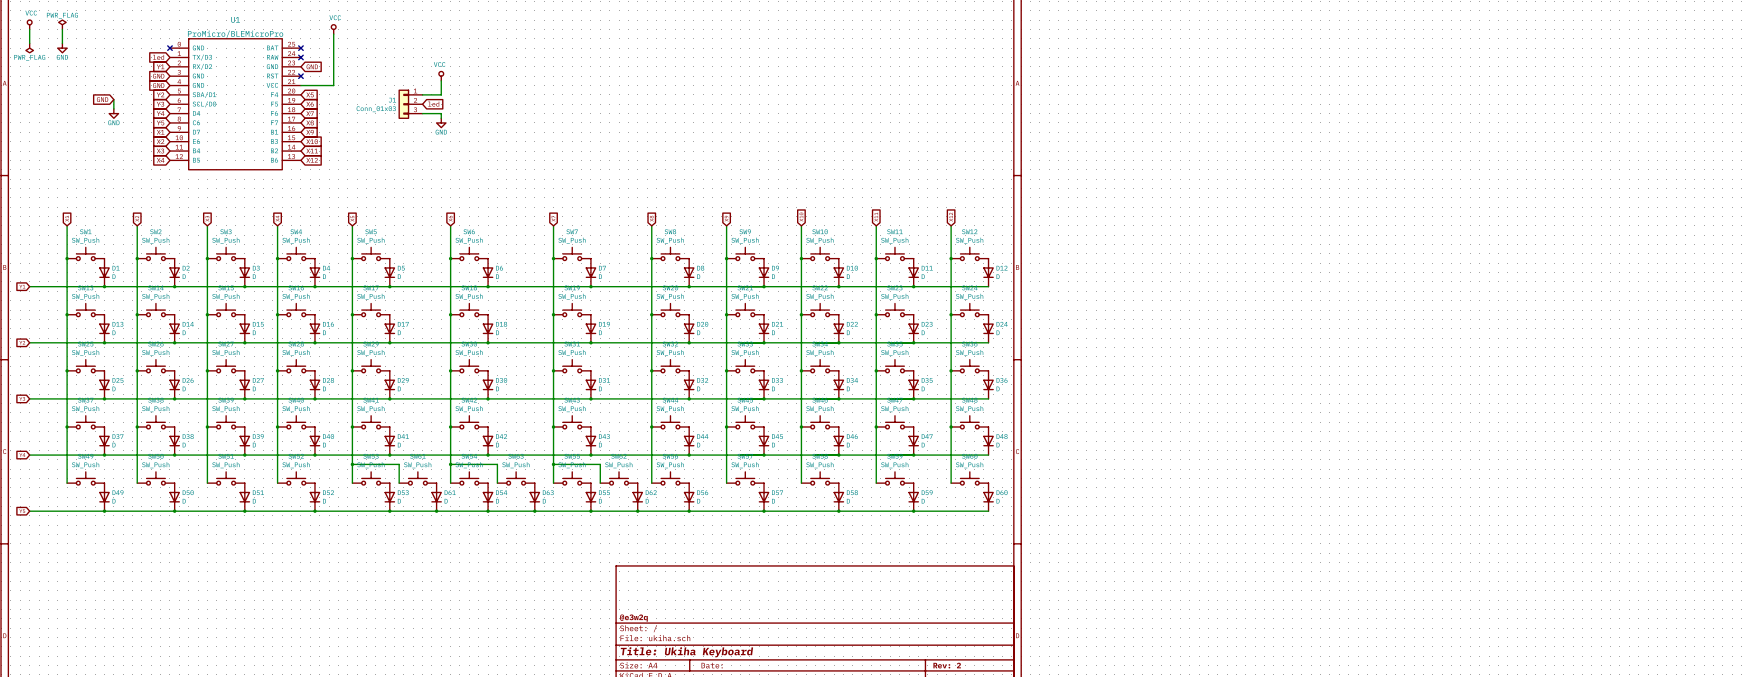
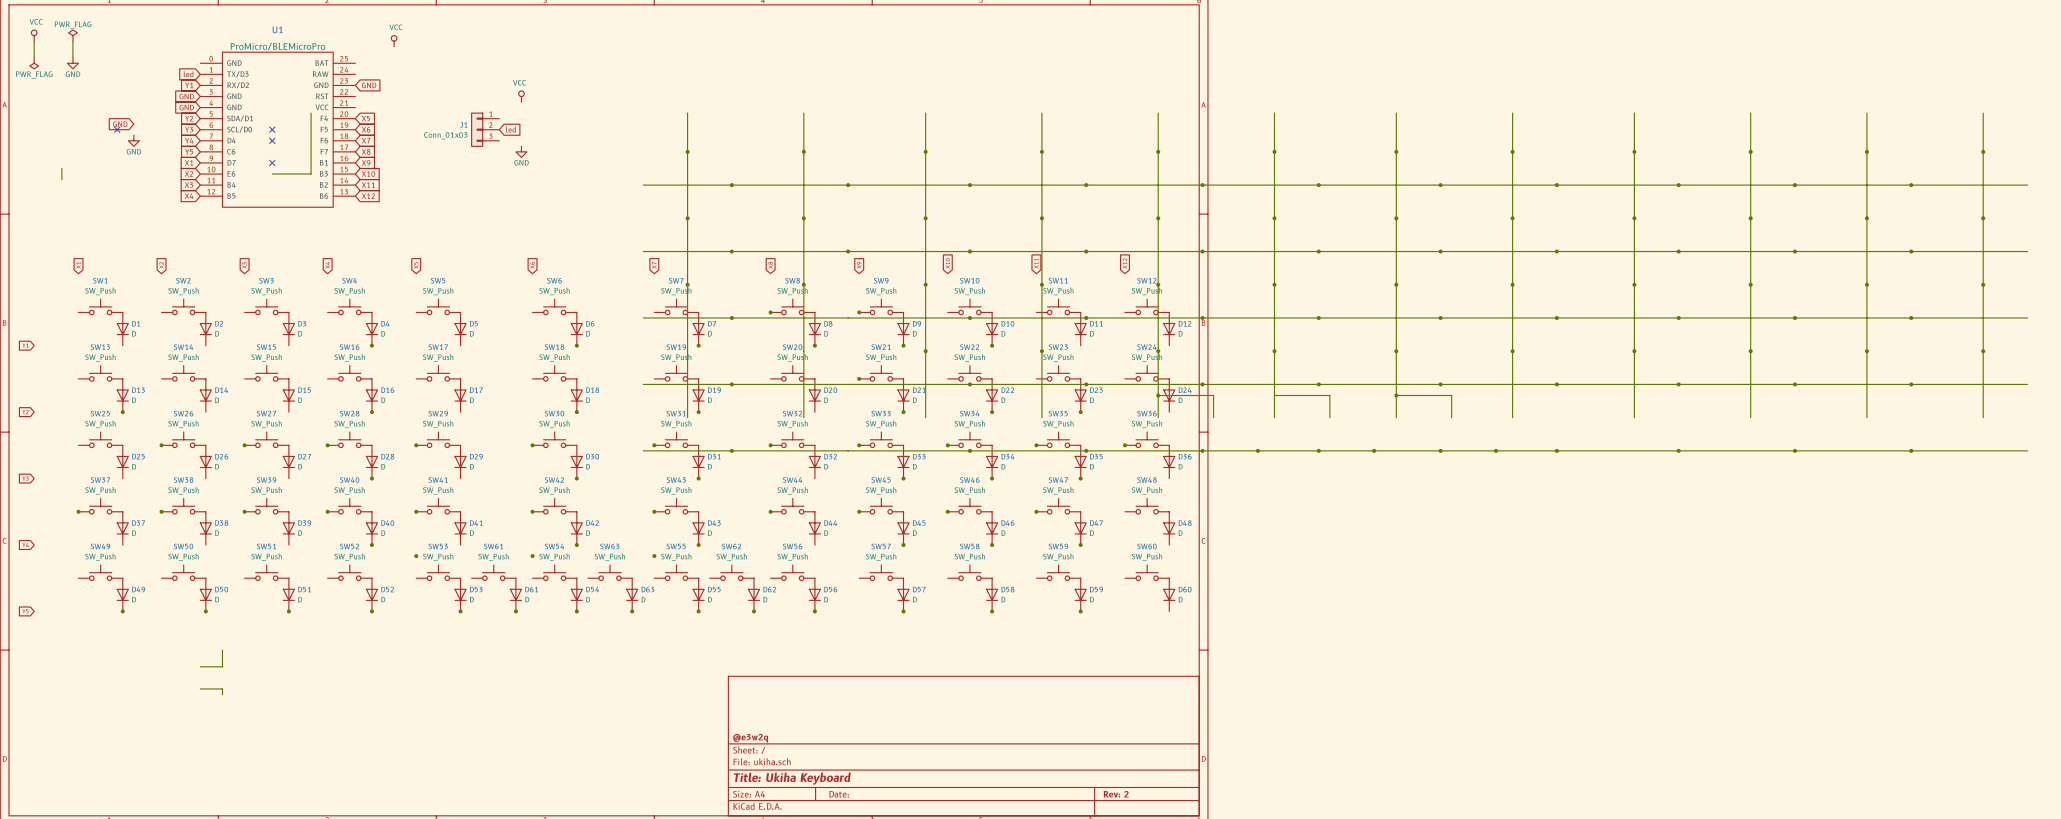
wire: (333, 34) (333, 85) (300, 85) -> (311, 113) (311, 174) (272, 174)
no-connect mark: (169, 48) -> none
no-connect mark: (300, 48) -> none
no-connect mark: (300, 57) -> none
no-connect mark: (300, 76) -> none
wire: (441, 80) (441, 94) (422, 94) -> none
wire: none -> (687, 113) (687, 417)
wire: none -> (803, 113) (803, 417)
wire: none -> (925, 113) (925, 417)
wire: none -> (1041, 113) (1041, 417)
wire: none -> (1158, 113) (1158, 417)
wire: none -> (1274, 113) (1274, 417)
wire: none -> (1396, 113) (1396, 417)
wire: none -> (1512, 113) (1512, 417)
wire: none -> (1634, 113) (1634, 417)
wire: none -> (1750, 113) (1750, 417)
wire: none -> (1866, 113) (1866, 417)
wire: none -> (1983, 113) (1983, 417)
wire: (113, 99) (113, 108) -> (61, 168) (61, 179)
no-connect mark: none -> (117, 129)
no-connect mark: none -> (272, 129)
no-connect mark: none -> (272, 140)
wire: (422, 113) (441, 113) (441, 118) -> none
junction: none -> (687, 151)
junction: none -> (803, 151)
junction: none -> (925, 151)
junction: none -> (1041, 151)
junction: none -> (1158, 151)
junction: none -> (1274, 151)
junction: none -> (1396, 151)
junction: none -> (1512, 151)
junction: none -> (1634, 151)
junction: none -> (1750, 151)
junction: none -> (1866, 151)
junction: none -> (1983, 151)
no-connect mark: none -> (272, 162)
wire: none -> (643, 185) (2027, 185)
junction: none -> (731, 185)
junction: none -> (848, 185)
junction: none -> (969, 185)
junction: none -> (1086, 185)
junction: none -> (1202, 185)
junction: none -> (1318, 185)
junction: none -> (1440, 185)
junction: none -> (1556, 185)
junction: none -> (1678, 185)
junction: none -> (1794, 185)
junction: none -> (1911, 185)
junction: none -> (687, 218)
junction: none -> (803, 218)
junction: none -> (925, 218)
junction: none -> (1041, 218)
junction: none -> (1158, 218)
junction: none -> (1274, 218)
junction: none -> (1396, 218)
junction: none -> (1512, 218)
junction: none -> (1634, 218)
junction: none -> (1750, 218)
junction: none -> (1866, 218)
junction: none -> (1983, 218)
wire: none -> (643, 251) (2027, 251)
junction: none -> (731, 251)
junction: none -> (848, 251)
junction: none -> (969, 251)
junction: none -> (1086, 251)
junction: none -> (1202, 251)
junction: none -> (1318, 251)
junction: none -> (1440, 251)
junction: none -> (1556, 251)
junction: none -> (1678, 251)
junction: none -> (1794, 251)
junction: none -> (1911, 251)
wire: (67, 225) (67, 483) -> none
wire: (137, 225) (137, 483) -> none
wire: (207, 225) (207, 483) -> none
wire: (277, 225) (277, 483) -> none
wire: (352, 225) (352, 483) -> none
wire: (450, 225) (450, 483) -> none
wire: (553, 225) (553, 483) -> none
wire: (651, 225) (651, 483) -> none
wire: (726, 225) (726, 483) -> none
wire: (801, 225) (801, 483) -> none
wire: (876, 225) (876, 483) -> none
wire: (951, 225) (951, 483) -> none
junction: none -> (687, 284)
junction: none -> (803, 284)
junction: none -> (925, 284)
junction: none -> (1041, 284)
junction: none -> (1158, 284)
junction: none -> (1274, 284)
junction: none -> (1396, 284)
junction: none -> (1512, 284)
junction: none -> (1634, 284)
junction: none -> (1750, 284)
junction: none -> (1866, 284)
junction: none -> (1983, 284)
junction: (67, 258) -> none
junction: (137, 258) -> none
junction: (207, 258) -> none
junction: (277, 258) -> none
junction: (352, 258) -> none
junction: (450, 258) -> none
junction: (553, 258) -> none
junction: (801, 258) -> none
junction: (876, 258) -> none
junction: (951, 258) -> none
wire: none -> (643, 317) (2027, 317)
junction: none -> (731, 317)
junction: none -> (969, 317)
junction: none -> (1086, 317)
junction: none -> (1202, 317)
junction: none -> (1318, 317)
junction: none -> (1440, 317)
junction: none -> (1556, 317)
junction: none -> (1678, 317)
junction: none -> (1794, 317)
junction: none -> (1911, 317)
wire: (29, 286) (988, 286) -> none
junction: (104, 286) -> none
junction: (174, 286) -> none
junction: (244, 286) -> none
junction: (389, 286) -> none
junction: (913, 286) -> none
junction: none -> (925, 351)
junction: none -> (1041, 351)
junction: none -> (1158, 351)
junction: none -> (1274, 351)
junction: none -> (1396, 351)
junction: none -> (1512, 351)
junction: none -> (1634, 351)
junction: none -> (1750, 351)
junction: none -> (1866, 351)
junction: none -> (1983, 351)
junction: (67, 314) -> none
junction: (137, 314) -> none
junction: (207, 314) -> none
junction: (277, 314) -> none
junction: (352, 314) -> none
junction: (450, 314) -> none
junction: (553, 314) -> none
junction: (651, 314) -> none
junction: (801, 314) -> none
junction: (876, 314) -> none
junction: (951, 314) -> none
wire: none -> (643, 384) (2027, 384)
junction: none -> (731, 384)
junction: none -> (969, 384)
junction: none -> (1086, 384)
junction: none -> (1202, 384)
junction: none -> (1318, 384)
junction: none -> (1440, 384)
junction: none -> (1556, 384)
junction: none -> (1678, 384)
junction: none -> (1794, 384)
junction: none -> (1911, 384)
wire: none -> (1158, 395) (1213, 395) (1213, 417)
junction: none -> (1158, 395)
wire: none -> (1274, 395) (1329, 395) (1329, 417)
wire: none -> (1396, 395) (1451, 395) (1451, 417)
junction: none -> (1396, 395)
wire: (29, 342) (988, 342) -> none
junction: (174, 342) -> none
junction: (244, 342) -> none
junction: (389, 342) -> none
junction: (689, 342) -> none
junction: (67, 370) -> none
wire: none -> (643, 450) (2027, 450)
junction: none -> (731, 450)
junction: none -> (969, 450)
junction: none -> (1086, 450)
junction: none -> (1202, 450)
junction: none -> (1257, 450)
junction: none -> (1318, 450)
junction: none -> (1374, 450)
junction: none -> (1440, 450)
junction: none -> (1495, 450)
junction: none -> (1556, 450)
junction: none -> (1678, 450)
junction: none -> (1794, 450)
junction: none -> (1911, 450)
wire: (29, 398) (988, 398) -> none
junction: (104, 398) -> none
junction: (174, 398) -> none
junction: (244, 398) -> none
junction: (389, 398) -> none
junction: (689, 398) -> none
junction: (951, 426) -> none
wire: (29, 455) (988, 455) -> none
junction: (104, 455) -> none
junction: (174, 455) -> none
junction: (244, 455) -> none
junction: (389, 455) -> none
junction: (689, 455) -> none
wire: (352, 464) (399, 464) (399, 483) -> none
wire: (450, 464) (497, 464) (497, 483) -> none
wire: (553, 464) (600, 464) (600, 483) -> none
wire: (29, 511) (988, 511) -> none
wire: none -> (222, 650) (222, 666) (200, 666)
wire: none -> (200, 688) (222, 688) (222, 694)

